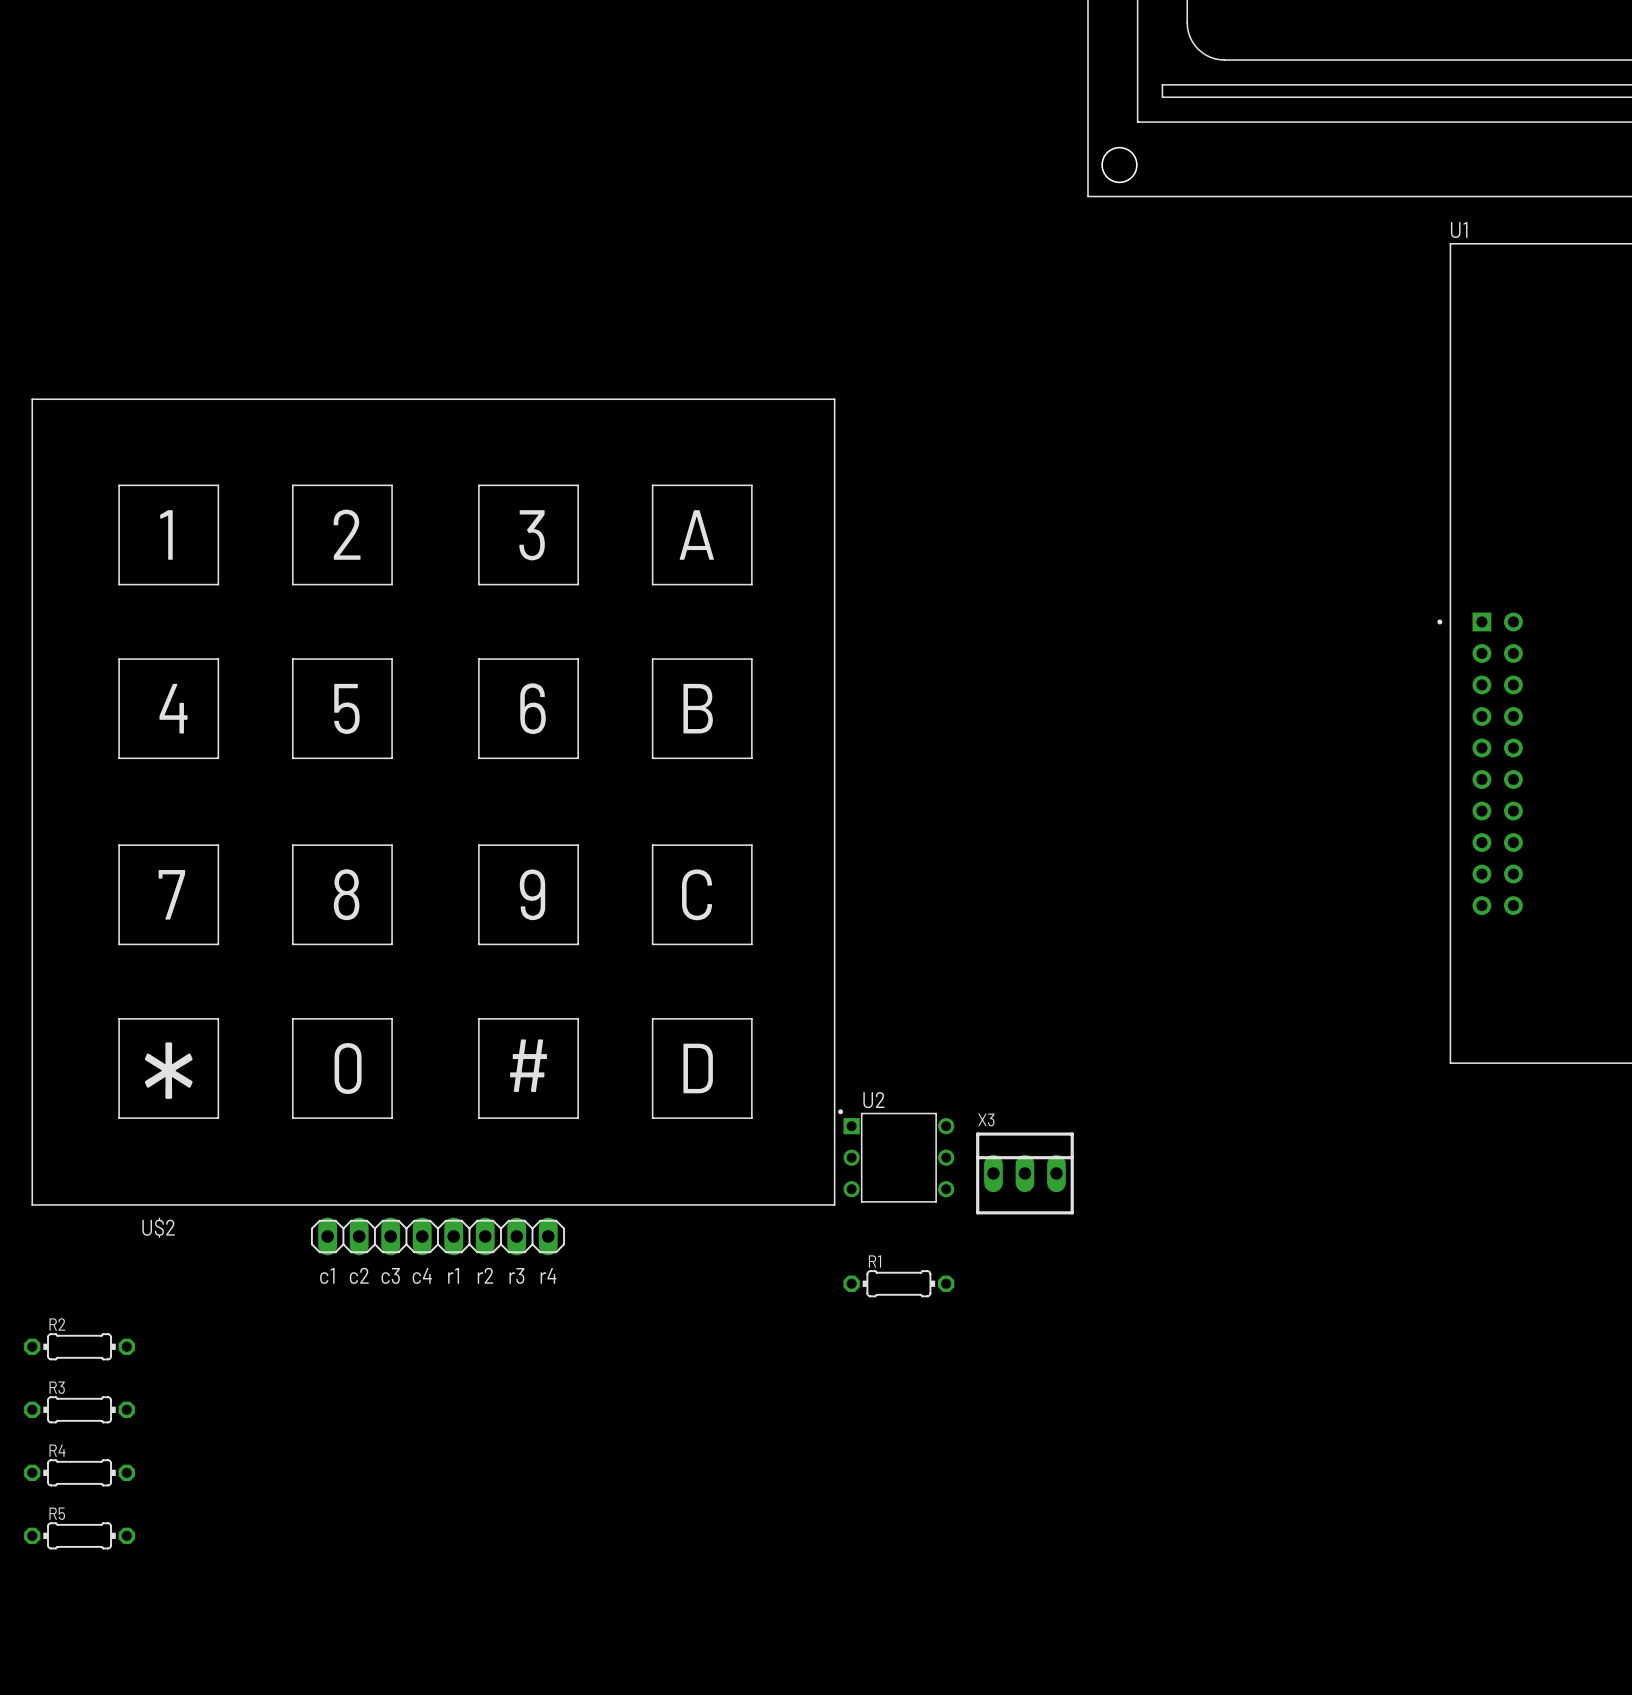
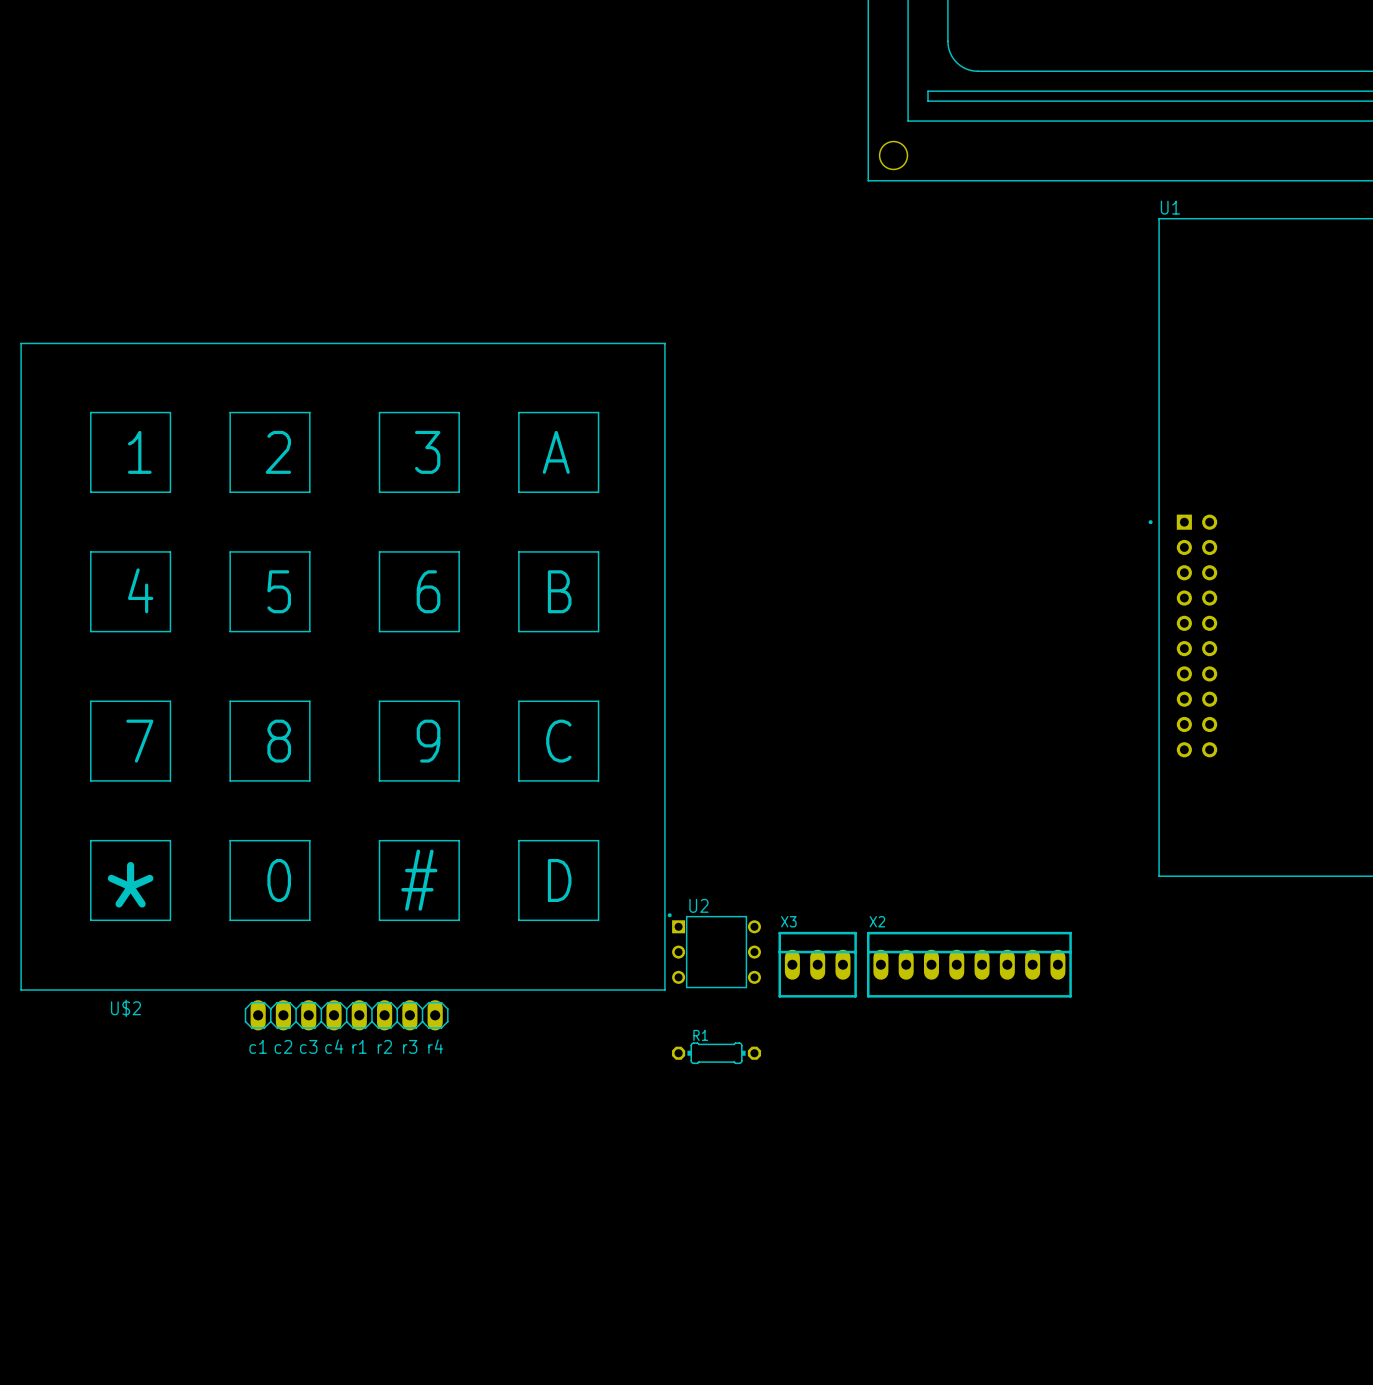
X2: none -> (969, 964)
R2: (79, 1346) -> none
R3: (79, 1409) -> none
R4: (79, 1472) -> none
R5: (79, 1535) -> none

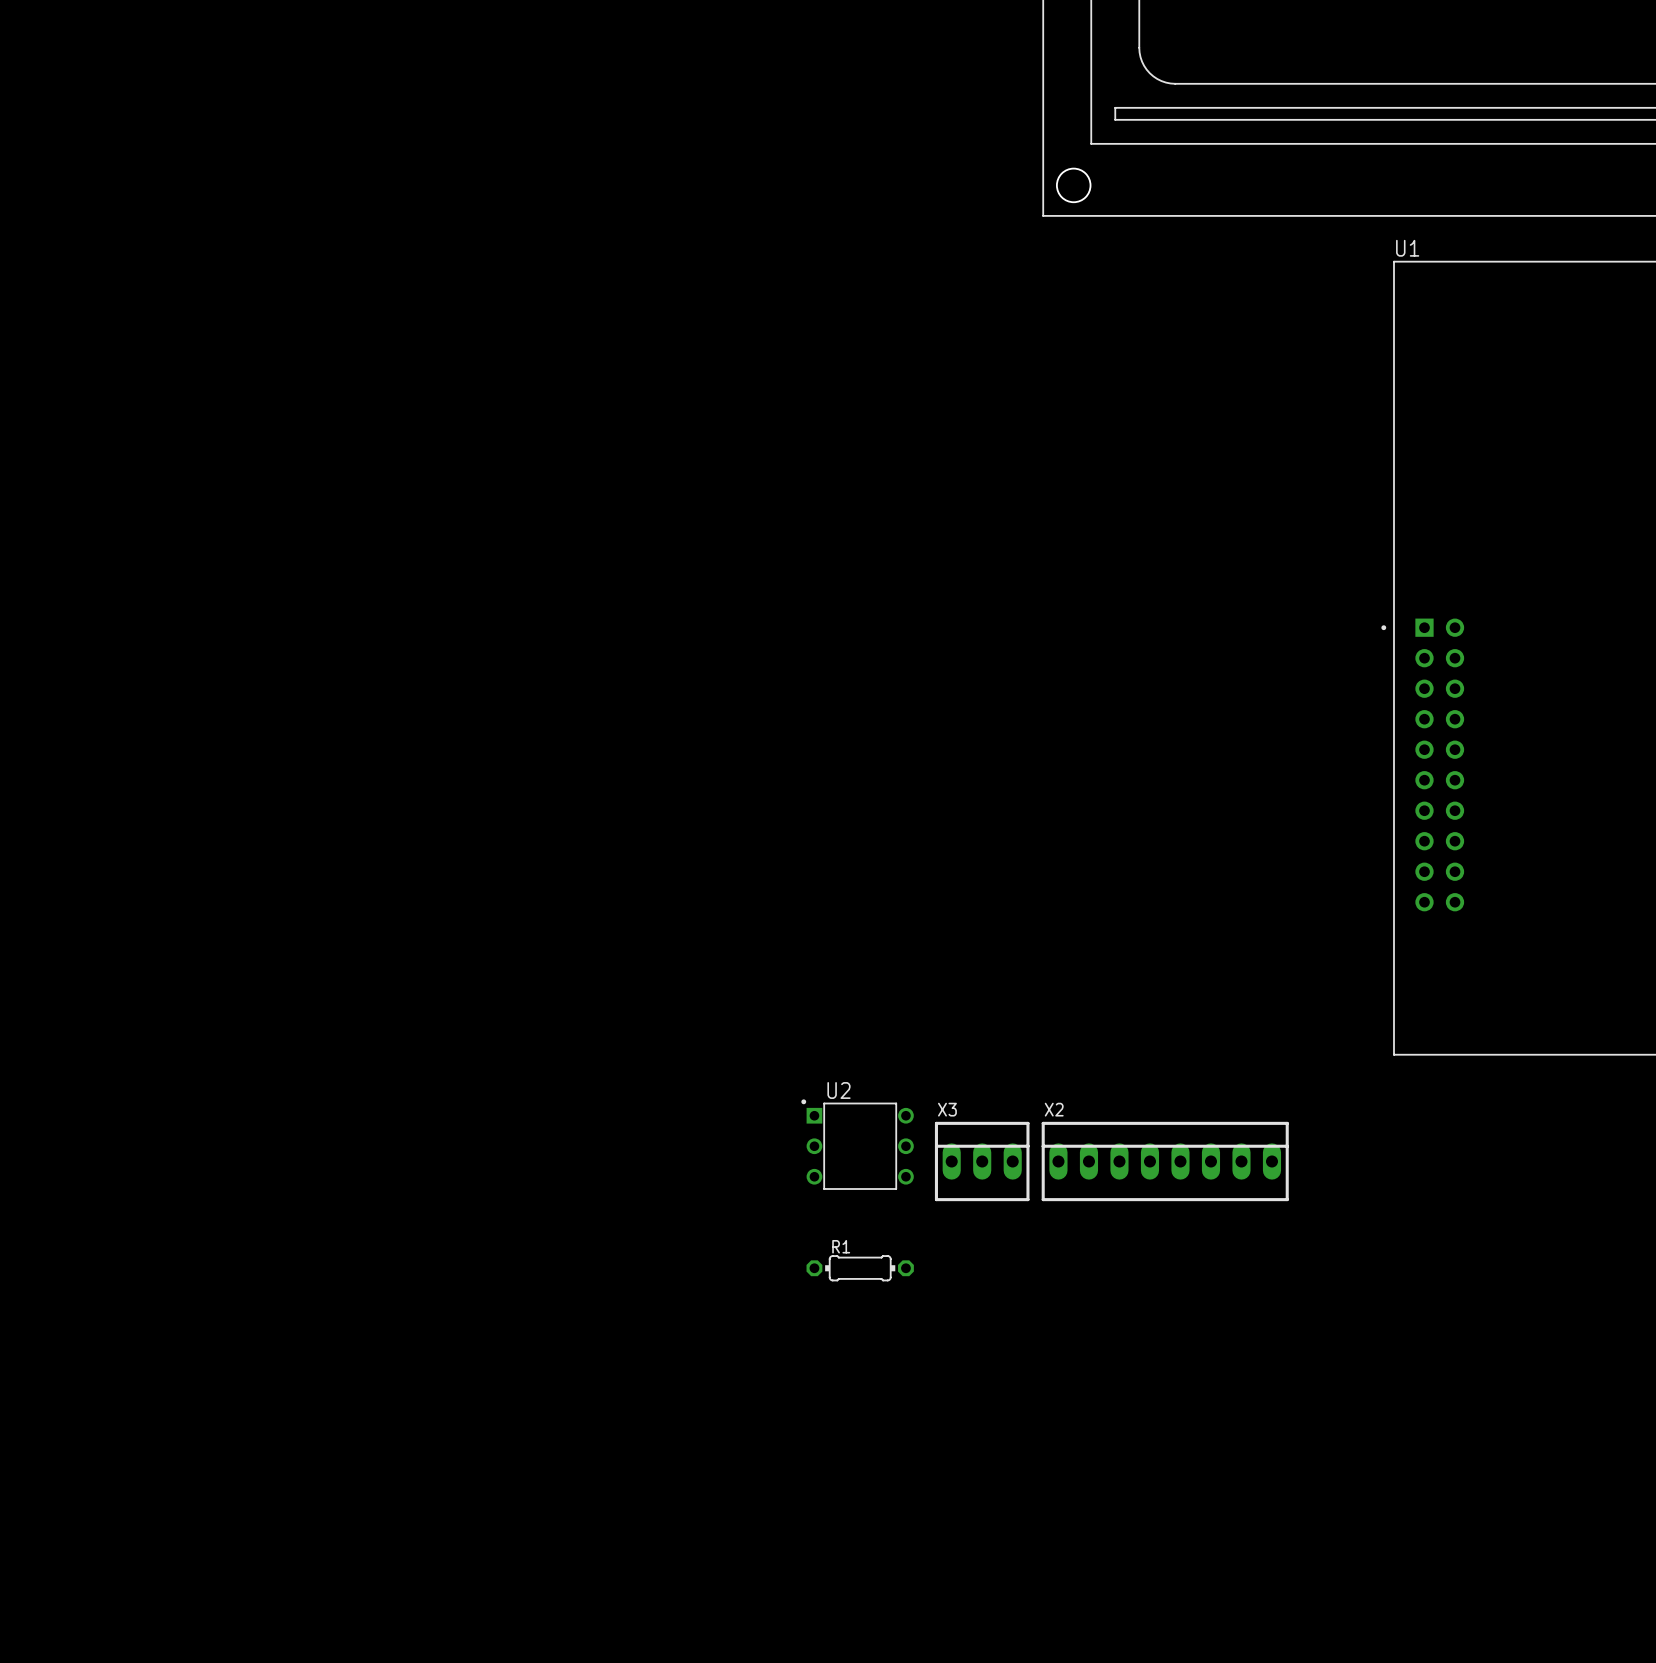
U$2: (343, 686) -> none

